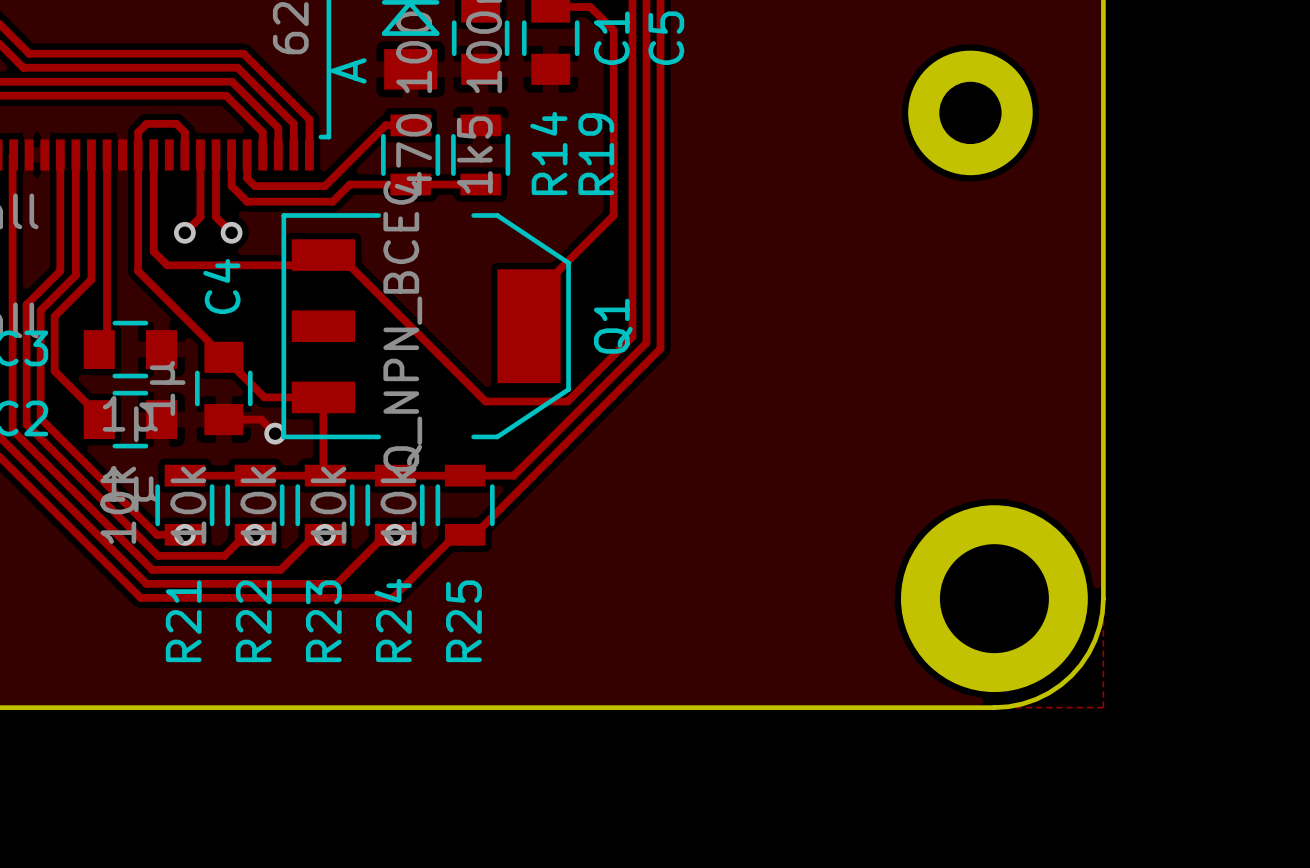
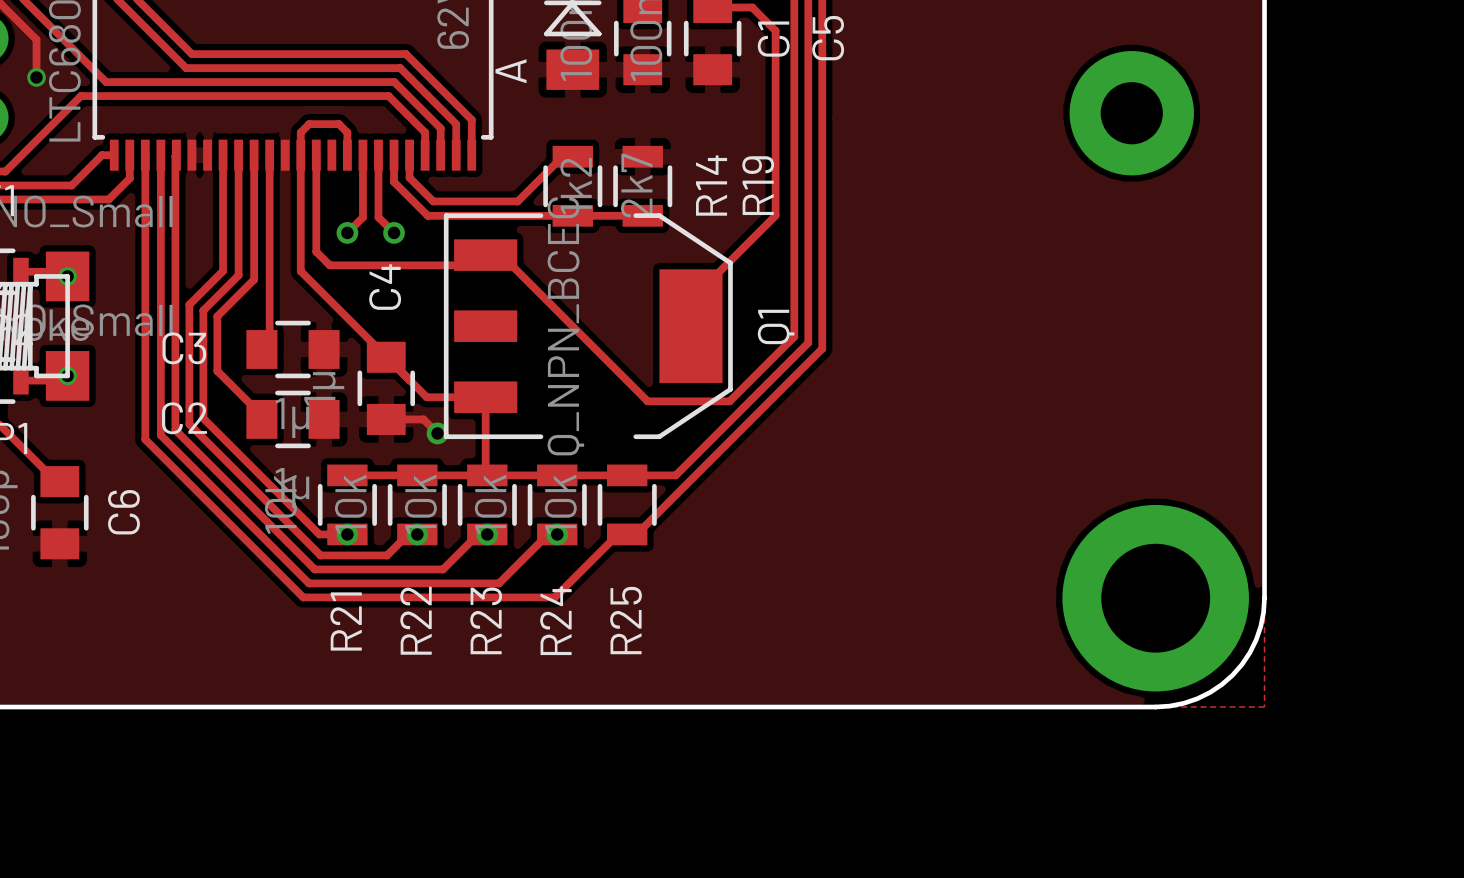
track: (410, 125) (385, 125) (324, 186) (254, 186) (247, 177) -> (572, 156) (562, 156) (517, 201) (433, 201) (409, 177)
R14 position: (410, 154) -> (572, 186)
R19 value: 470 (413, 154) -> 1k2 (576, 186)
R14 value: 1k5 (474, 154) -> 2k7 (636, 185)
R19 position: (480, 154) -> (642, 186)
track: (231, 181) (231, 186) (247, 201) (332, 201) (349, 184) (480, 184) -> (394, 182) (427, 215) (642, 215)

